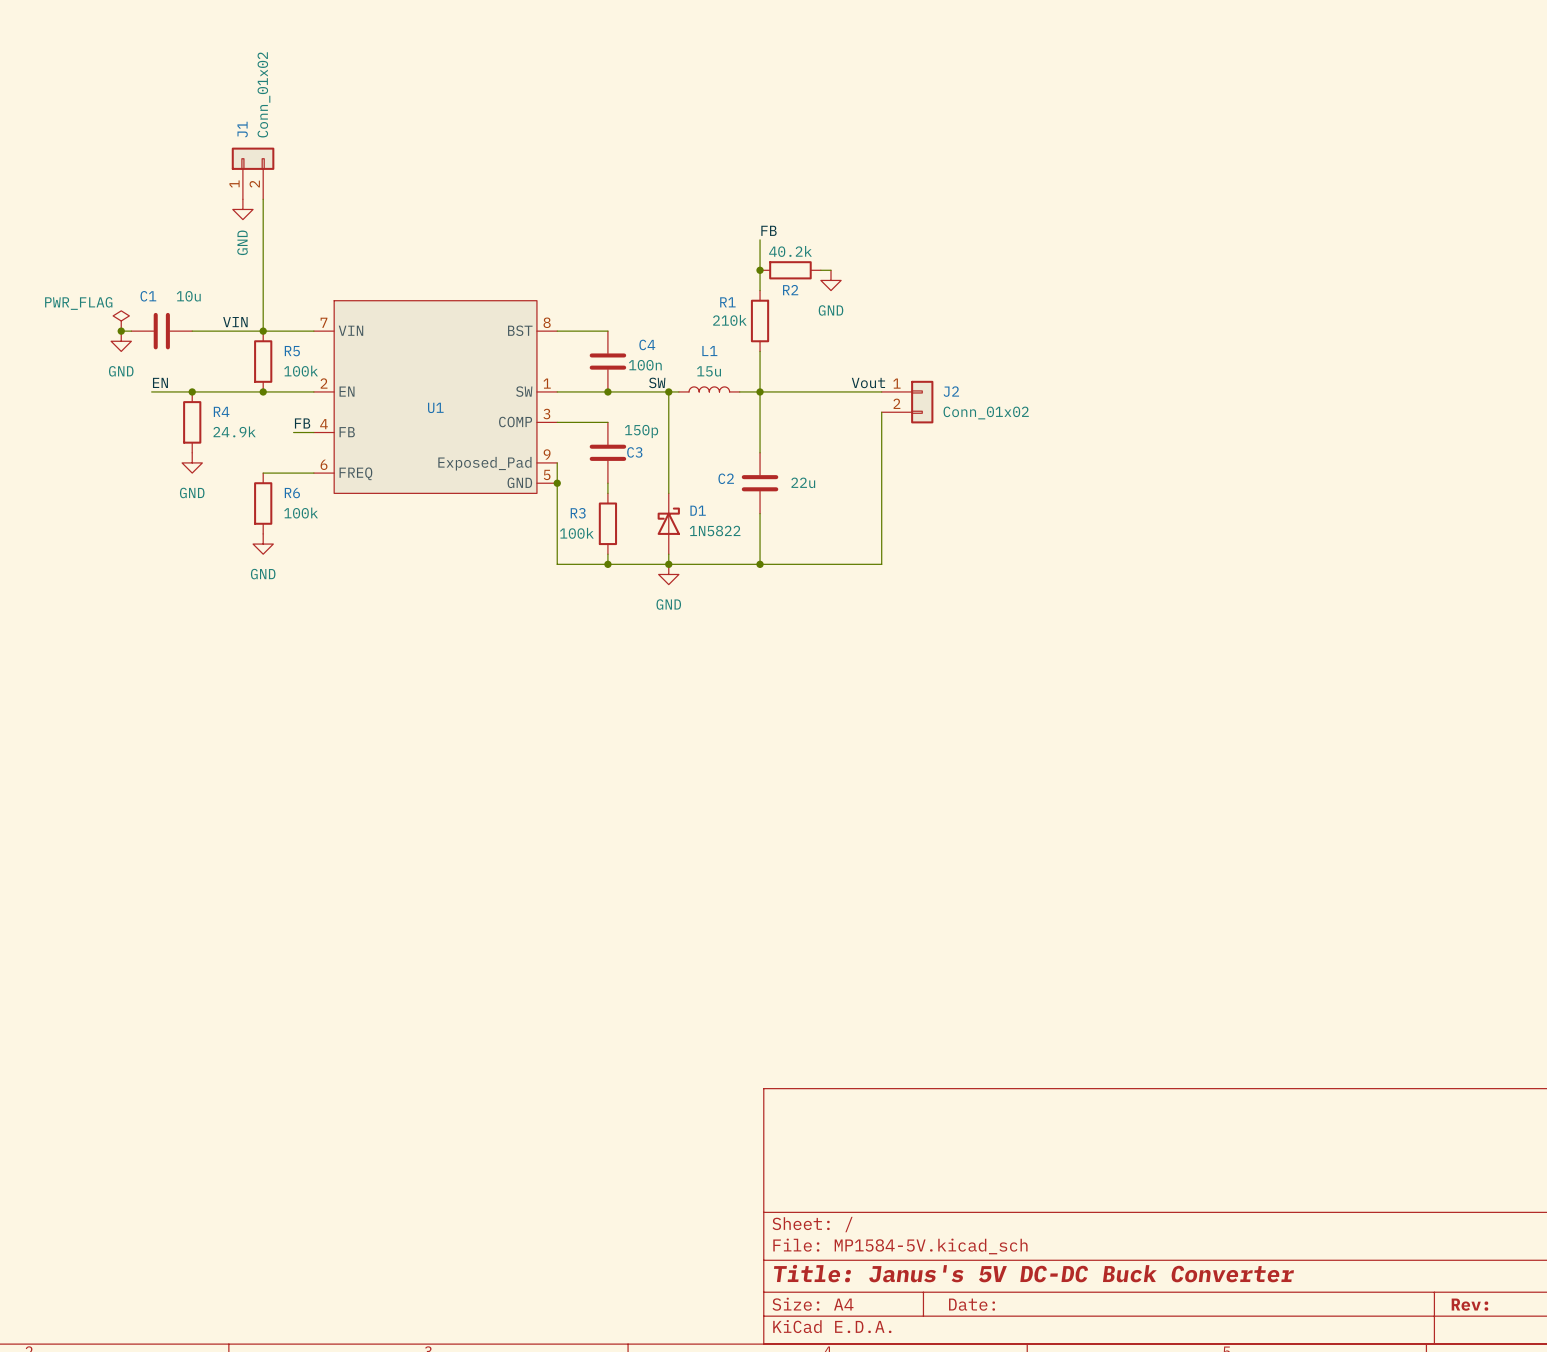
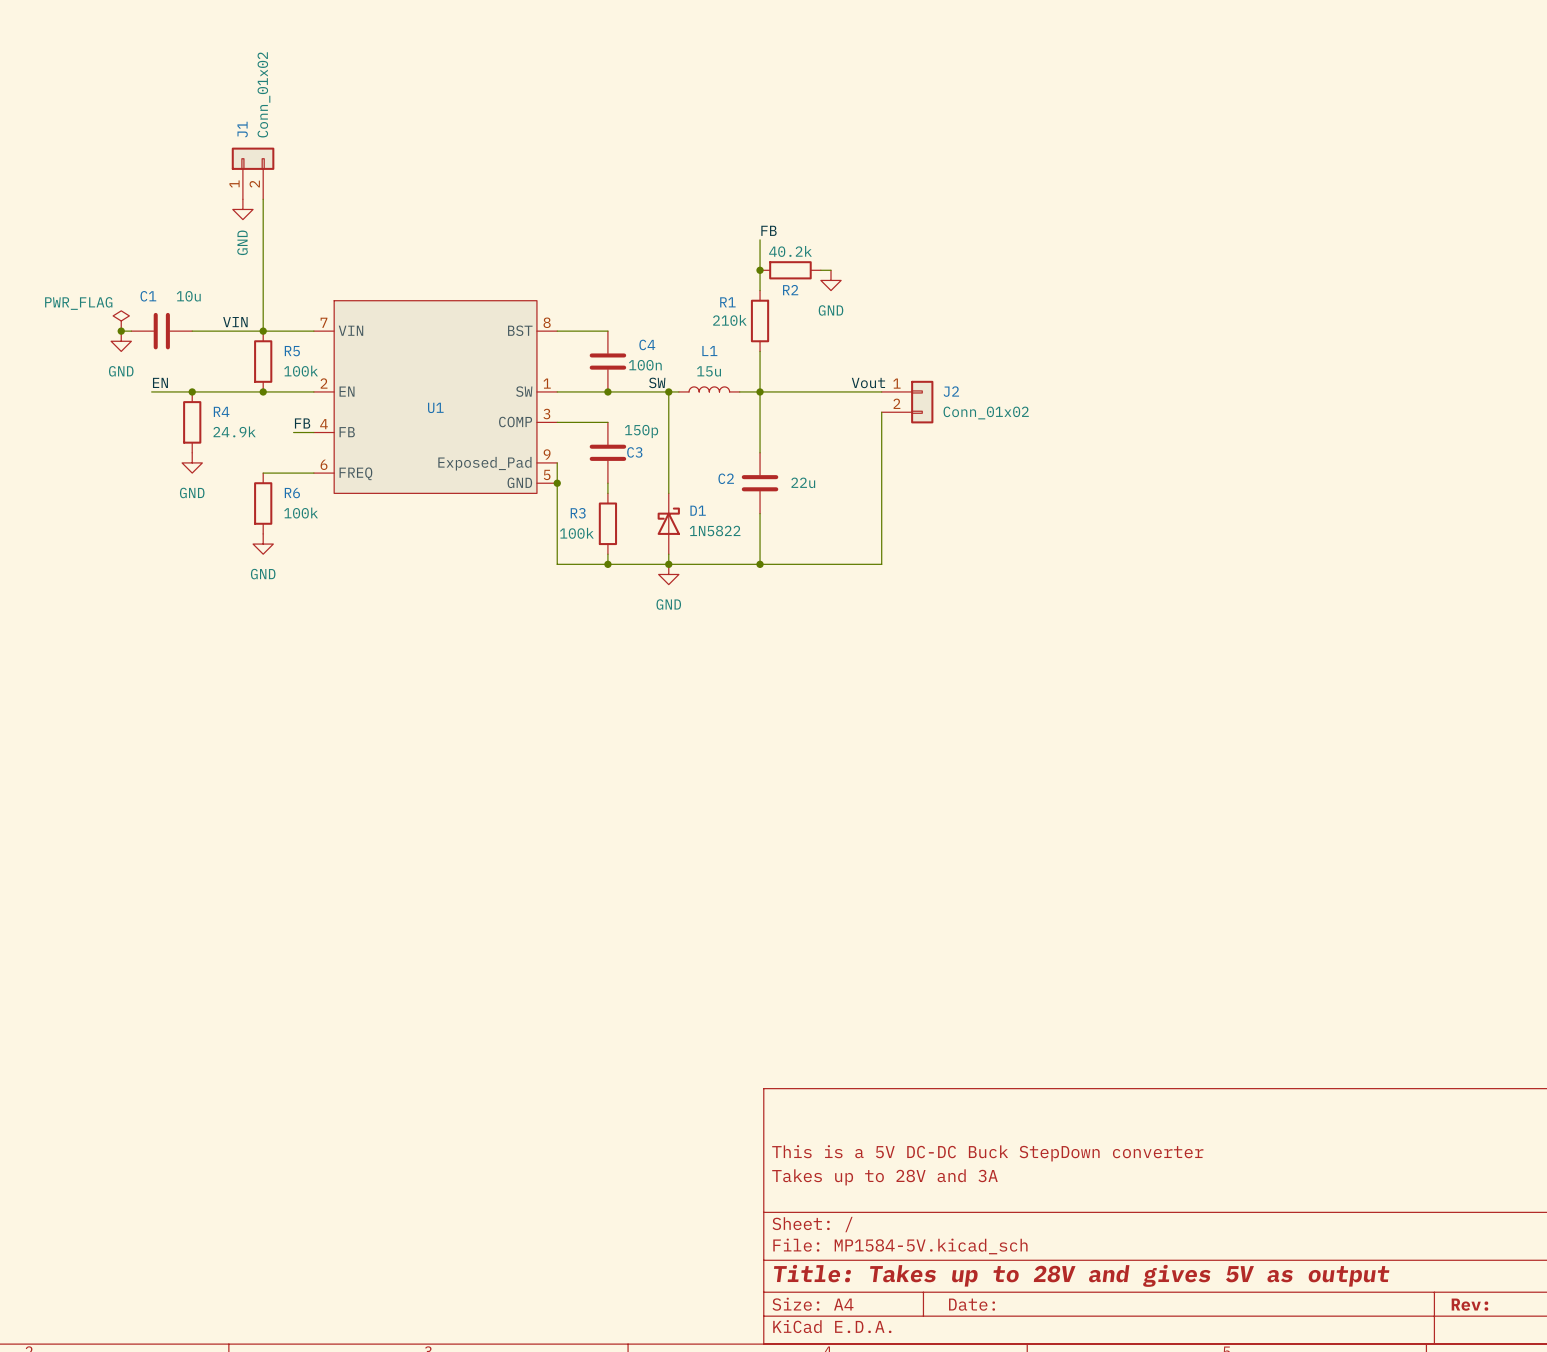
title block: none -> This is a 5V DC-DC Buck StepDown converter (987, 1153)
title block: none -> Takes up to 28V and 3A (884, 1177)
title block: Title: Janus's 5V DC-DC Buck Converter (1033, 1273) -> Title: Takes up to 28V and gives 5V as output (1081, 1275)

